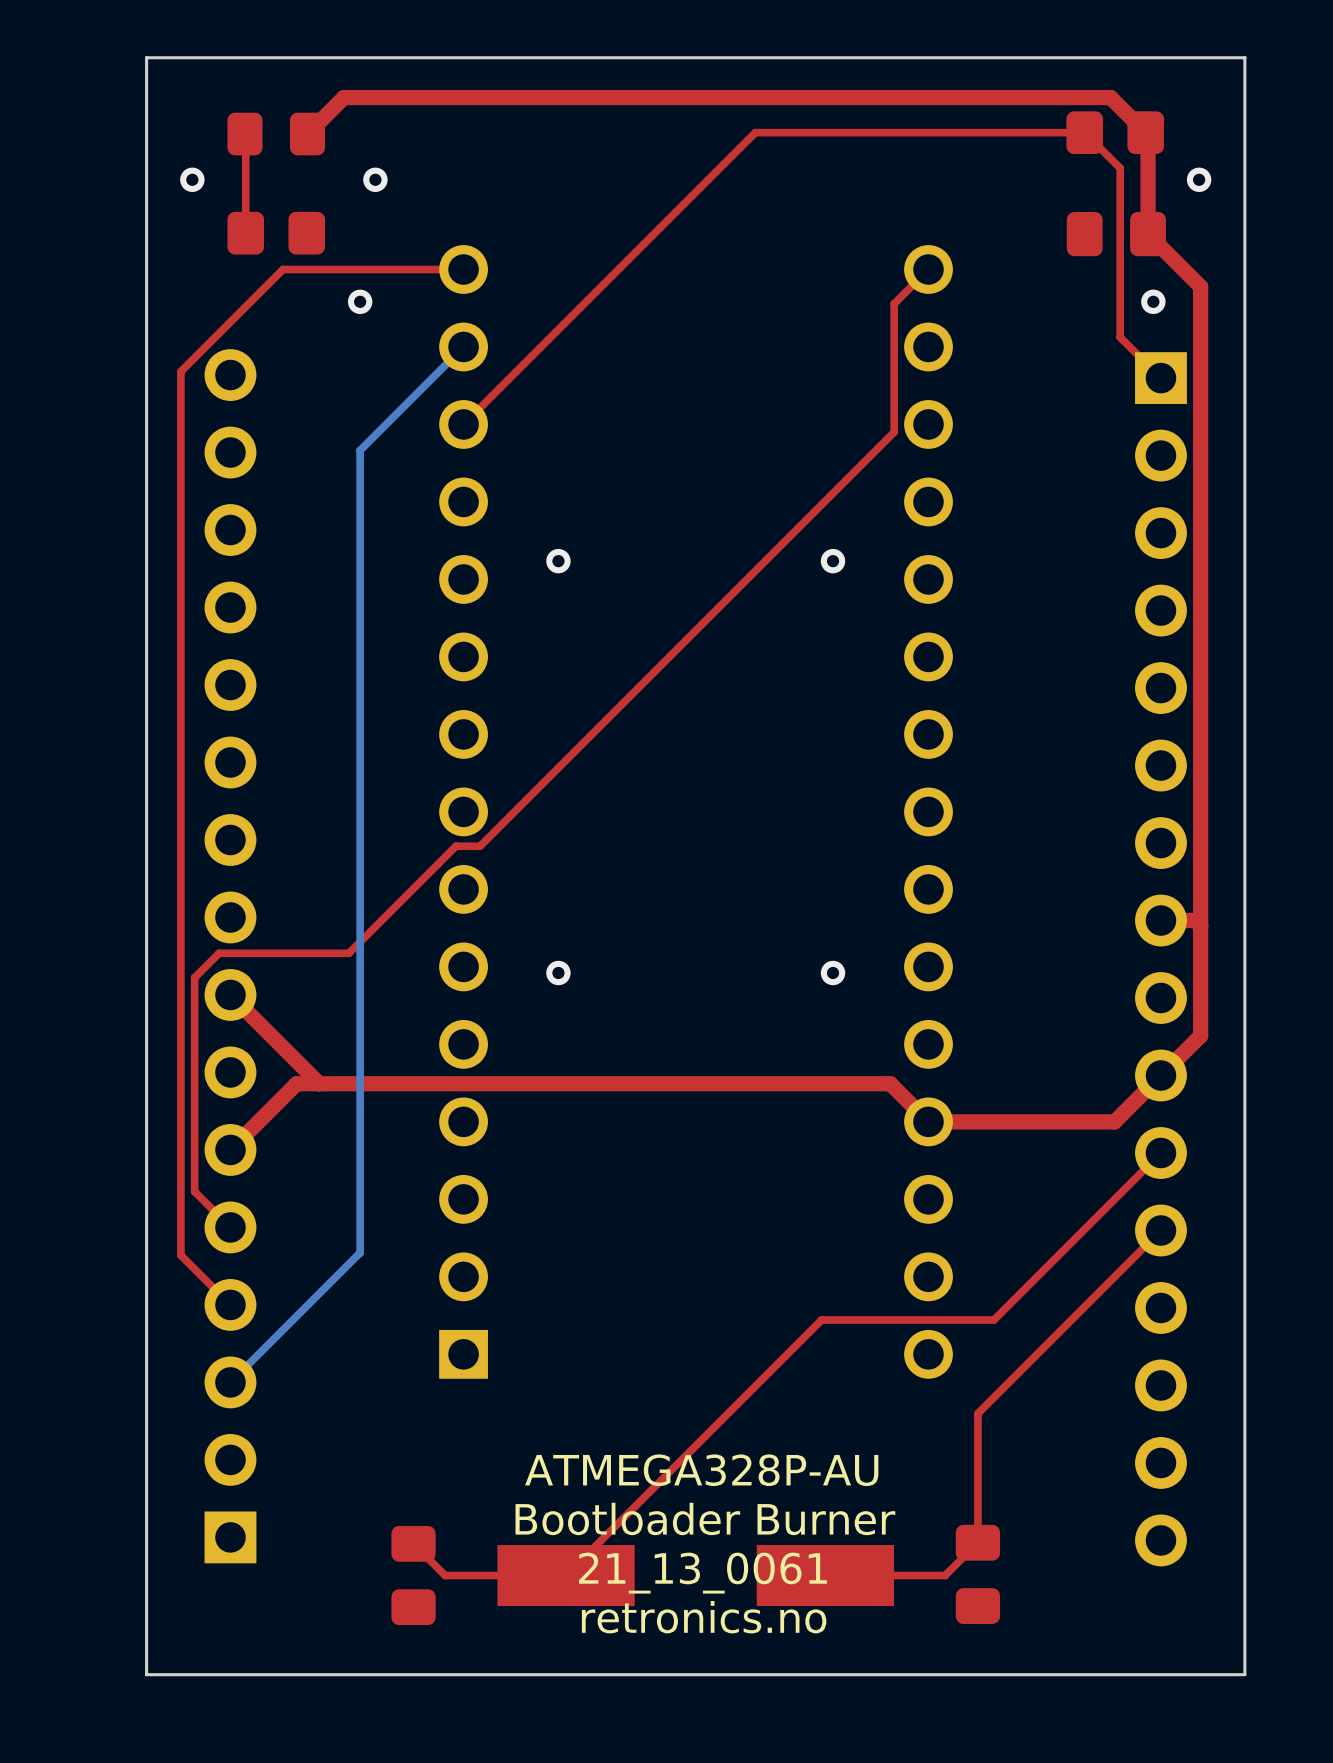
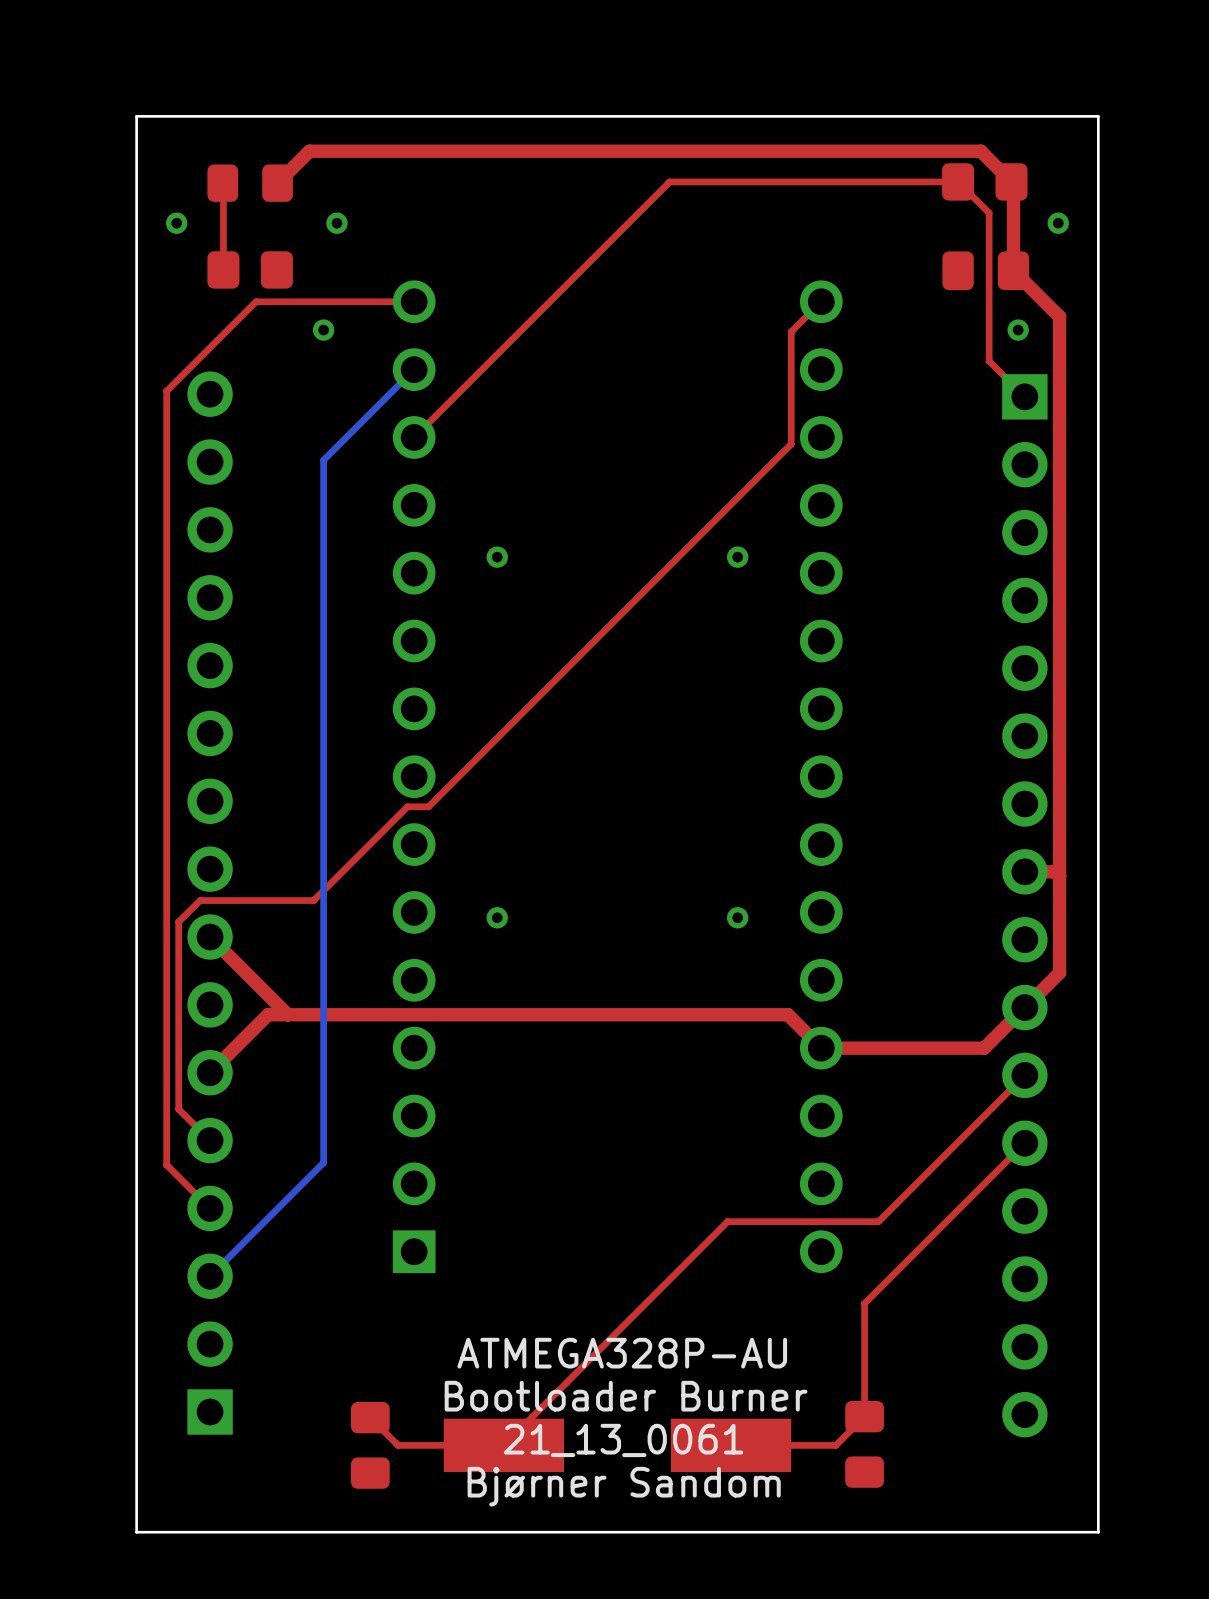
text: retronics.no (704, 1617) -> Bjørner Sandom (624, 1486)

